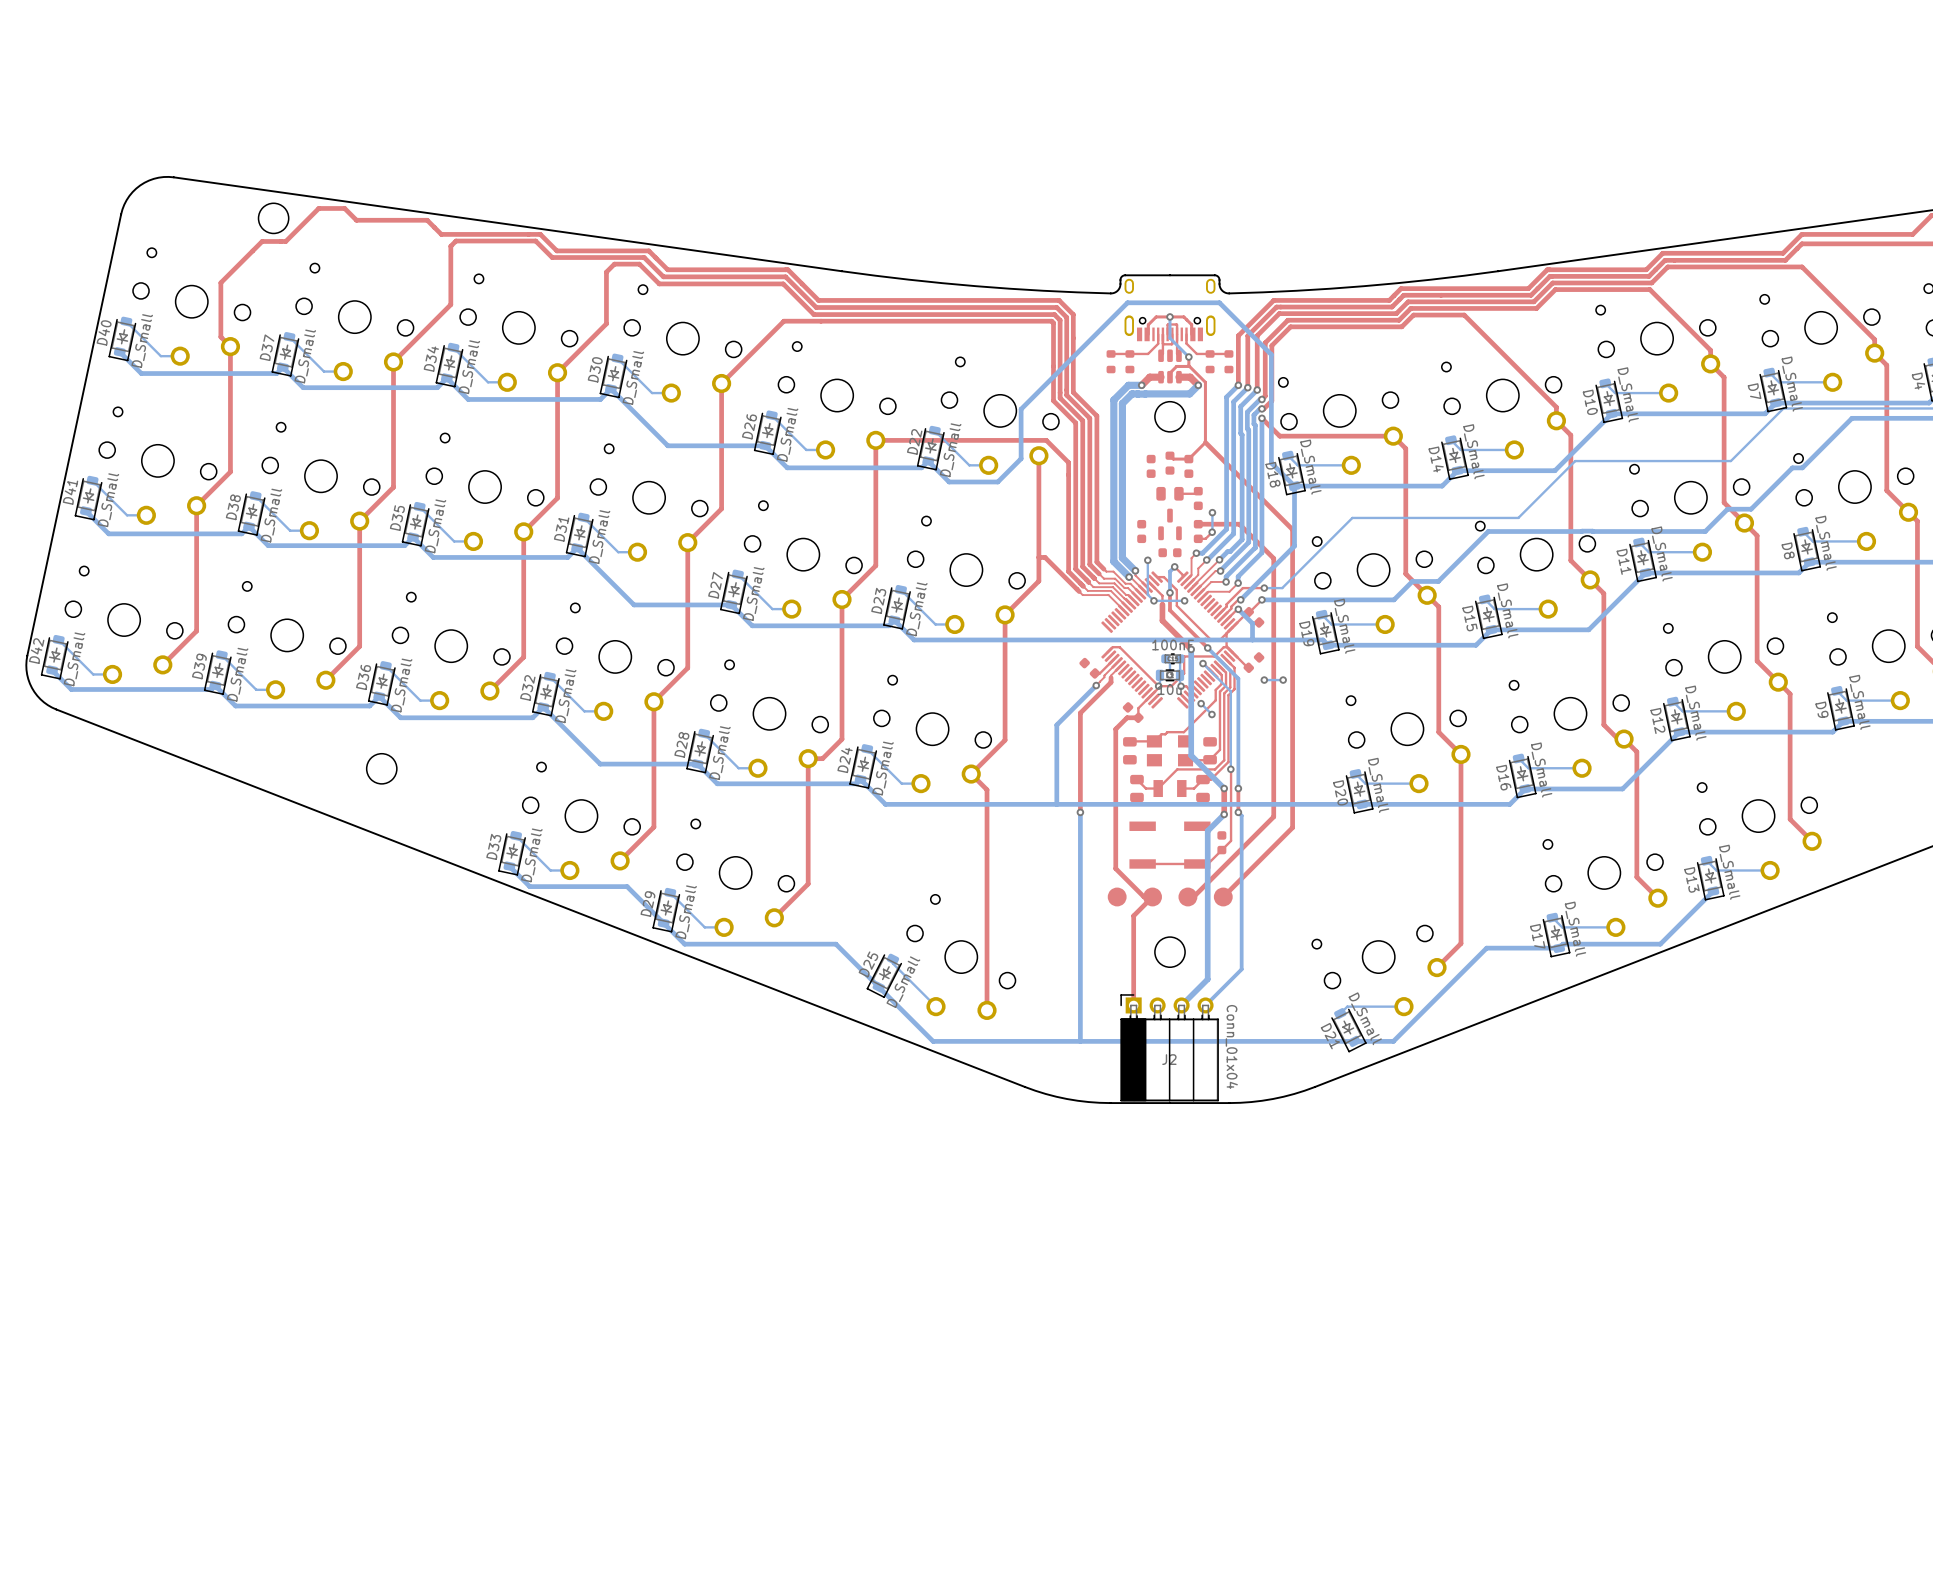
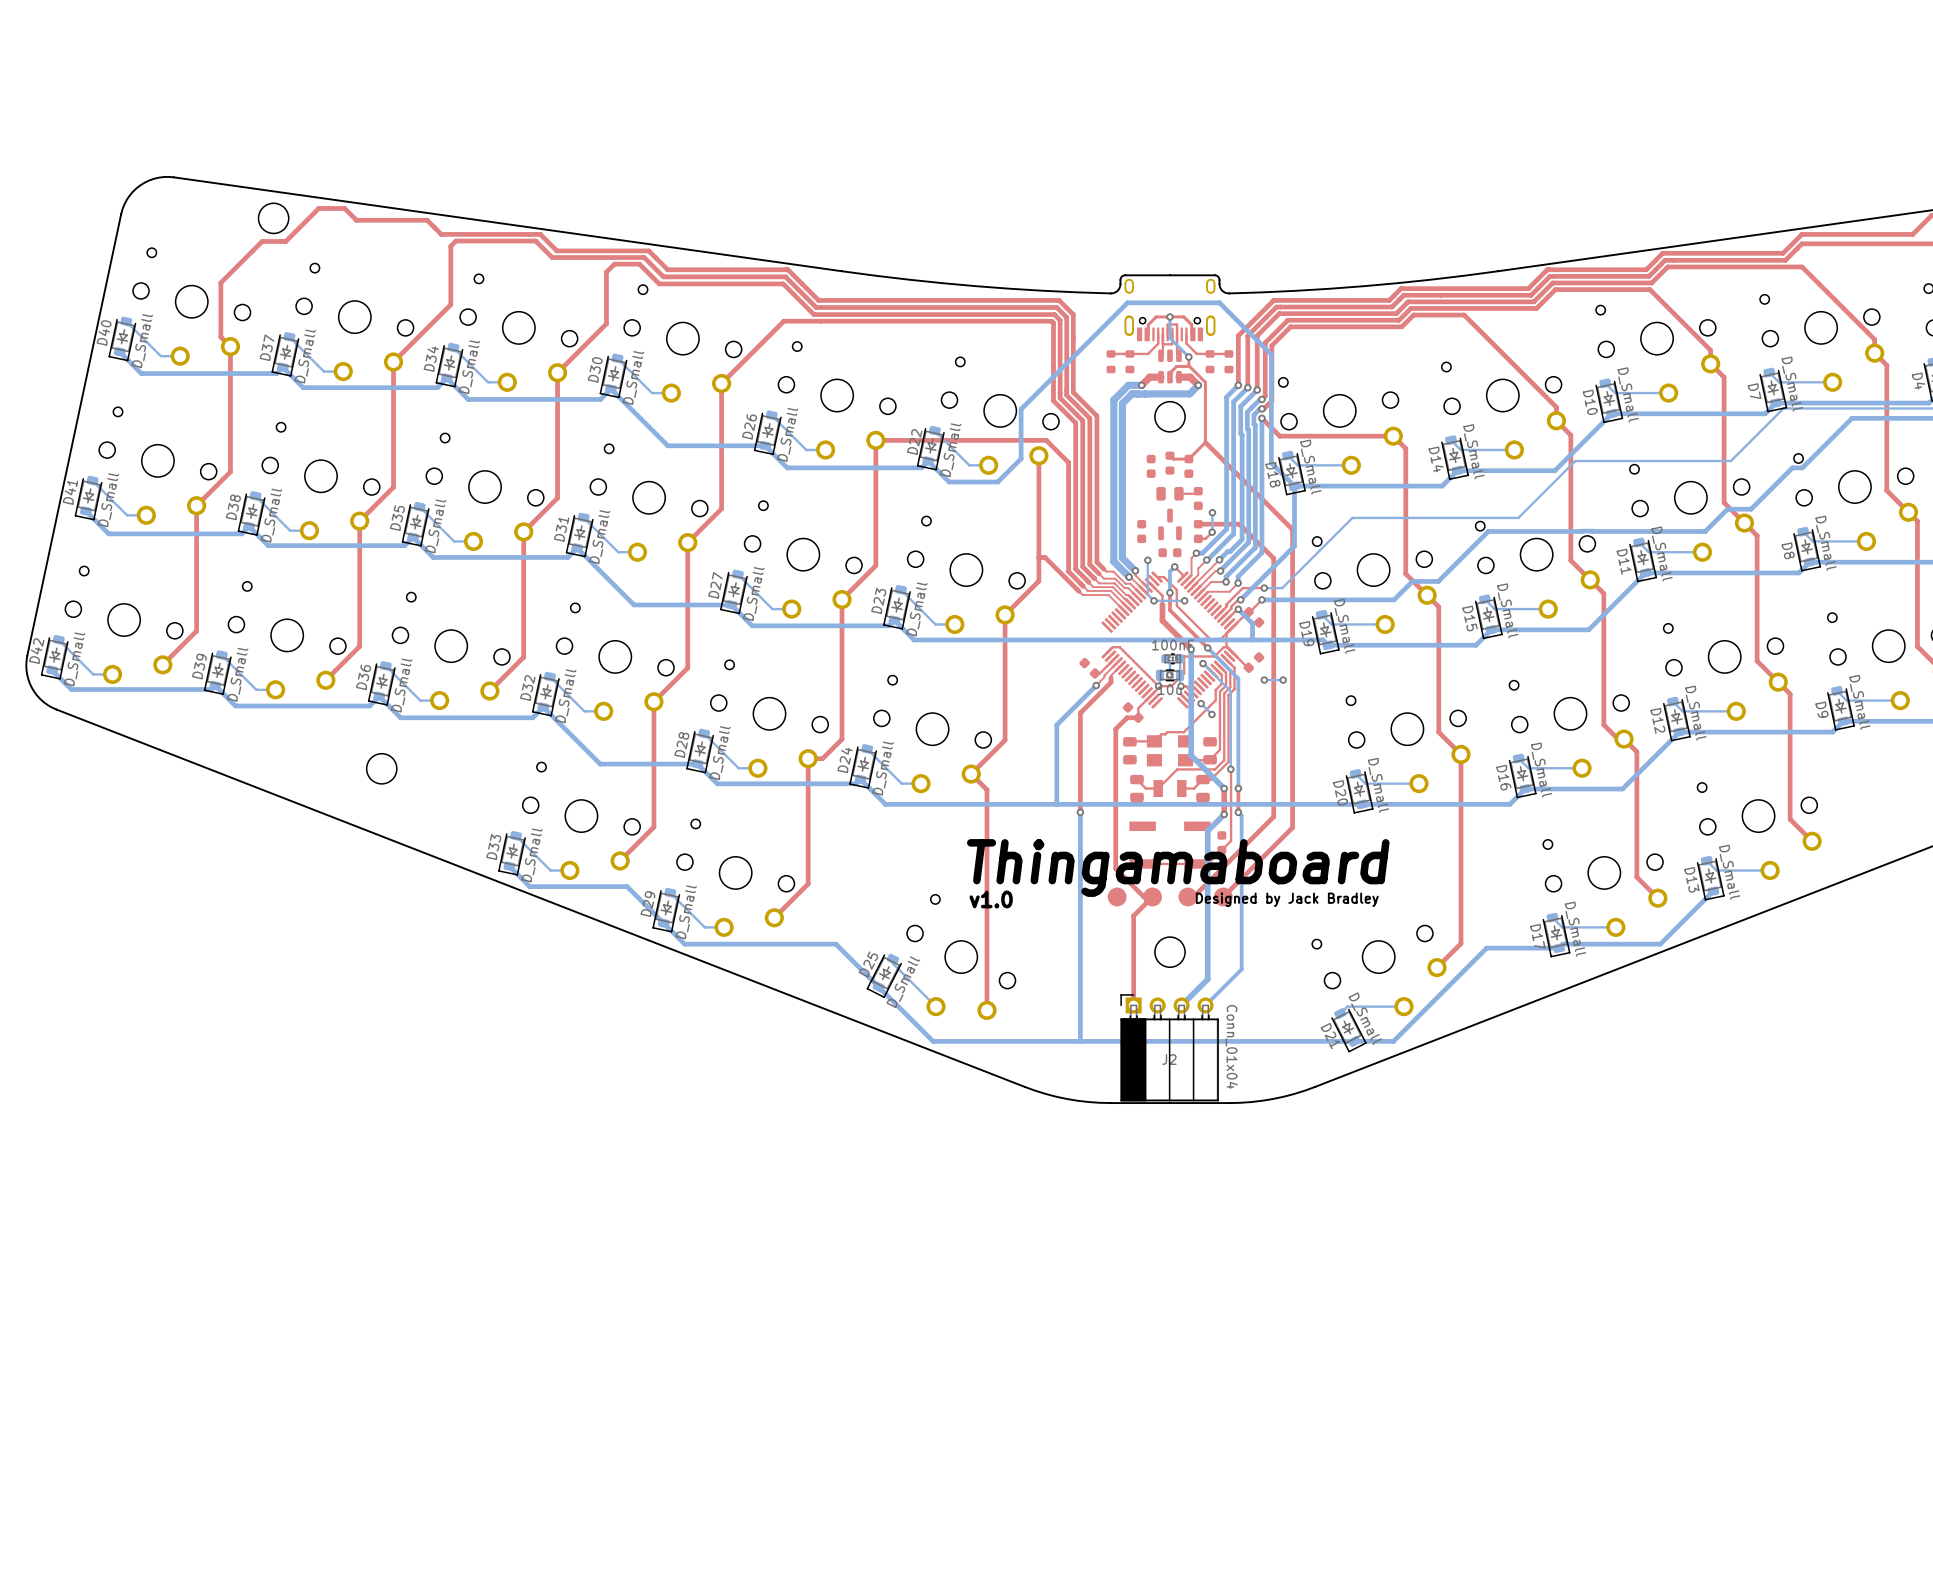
text: none -> Thingamaboard (1178, 868)
text: none -> v1.0 (991, 899)
text: none -> Designed by Jack Bradley (1287, 899)

